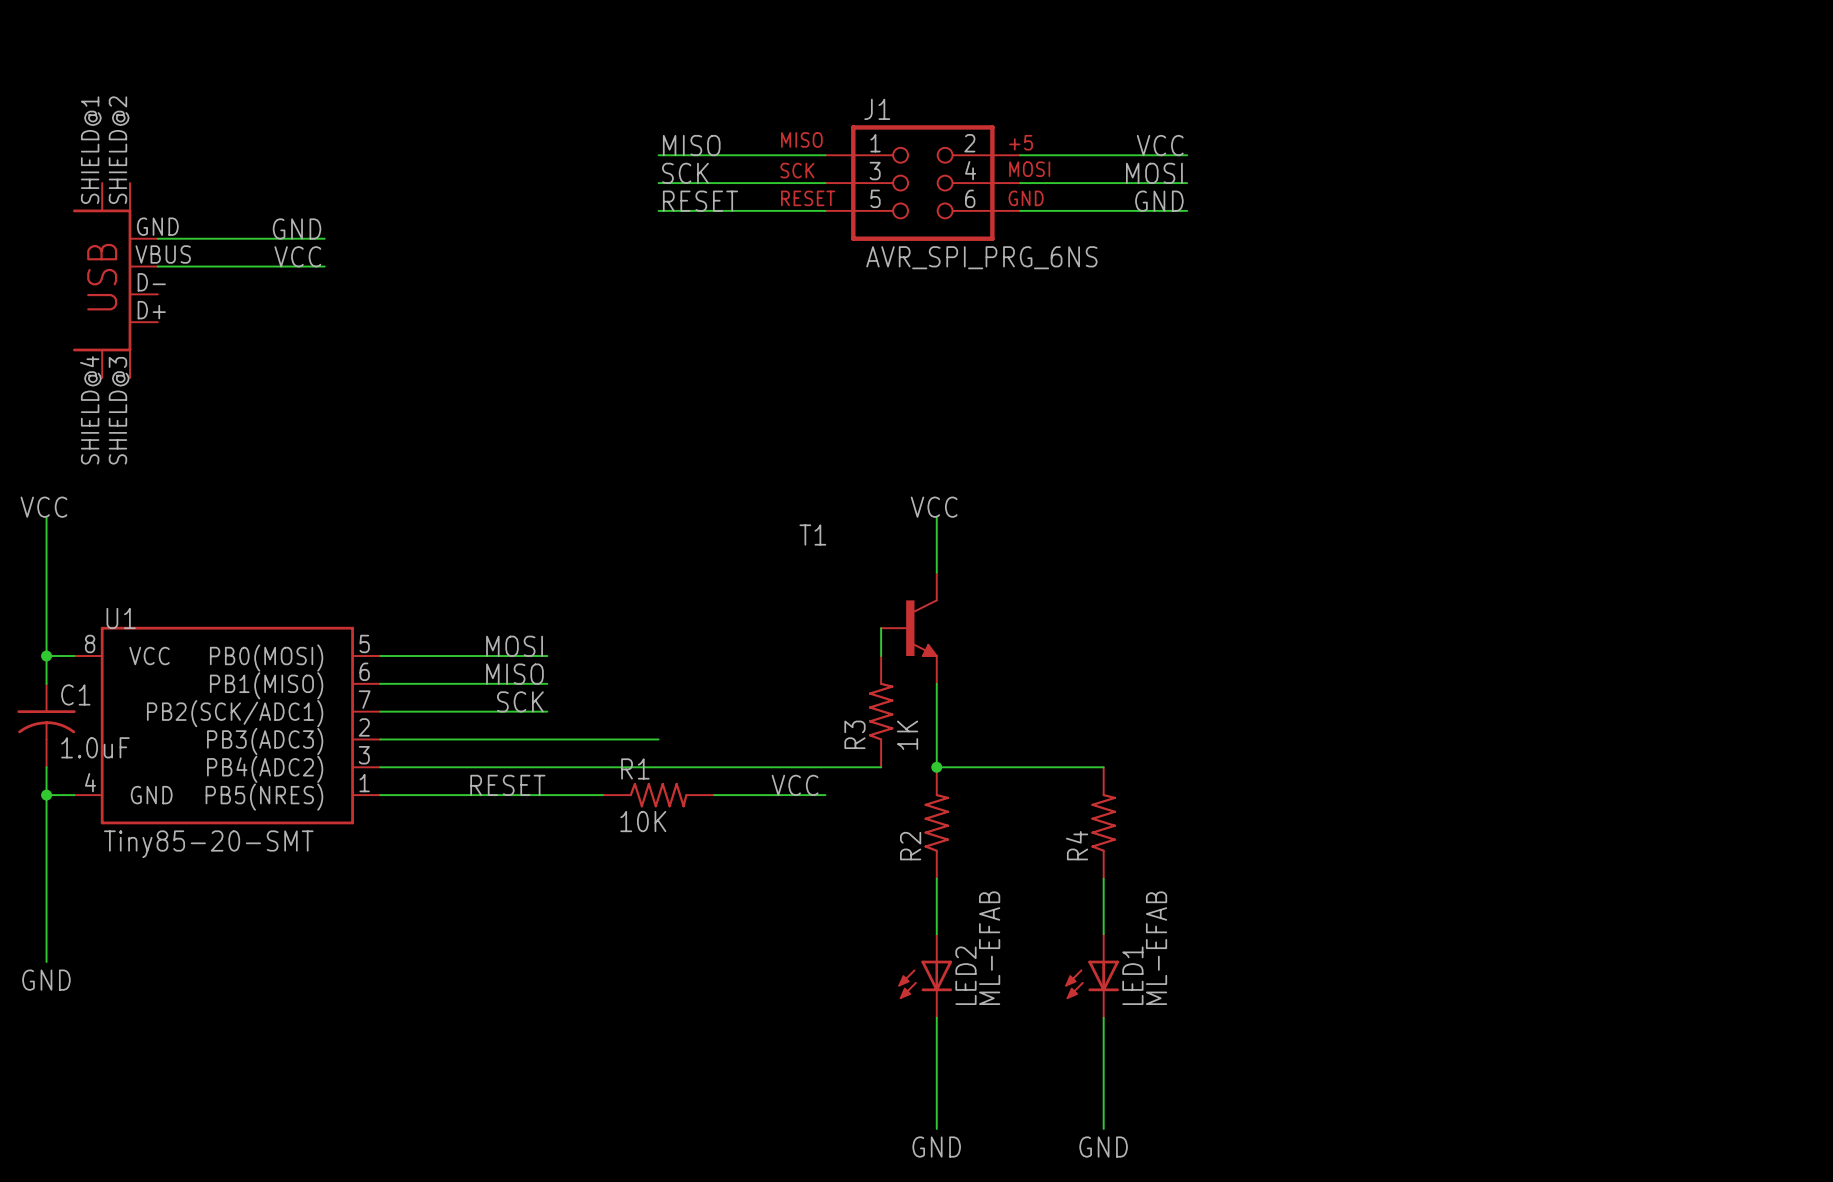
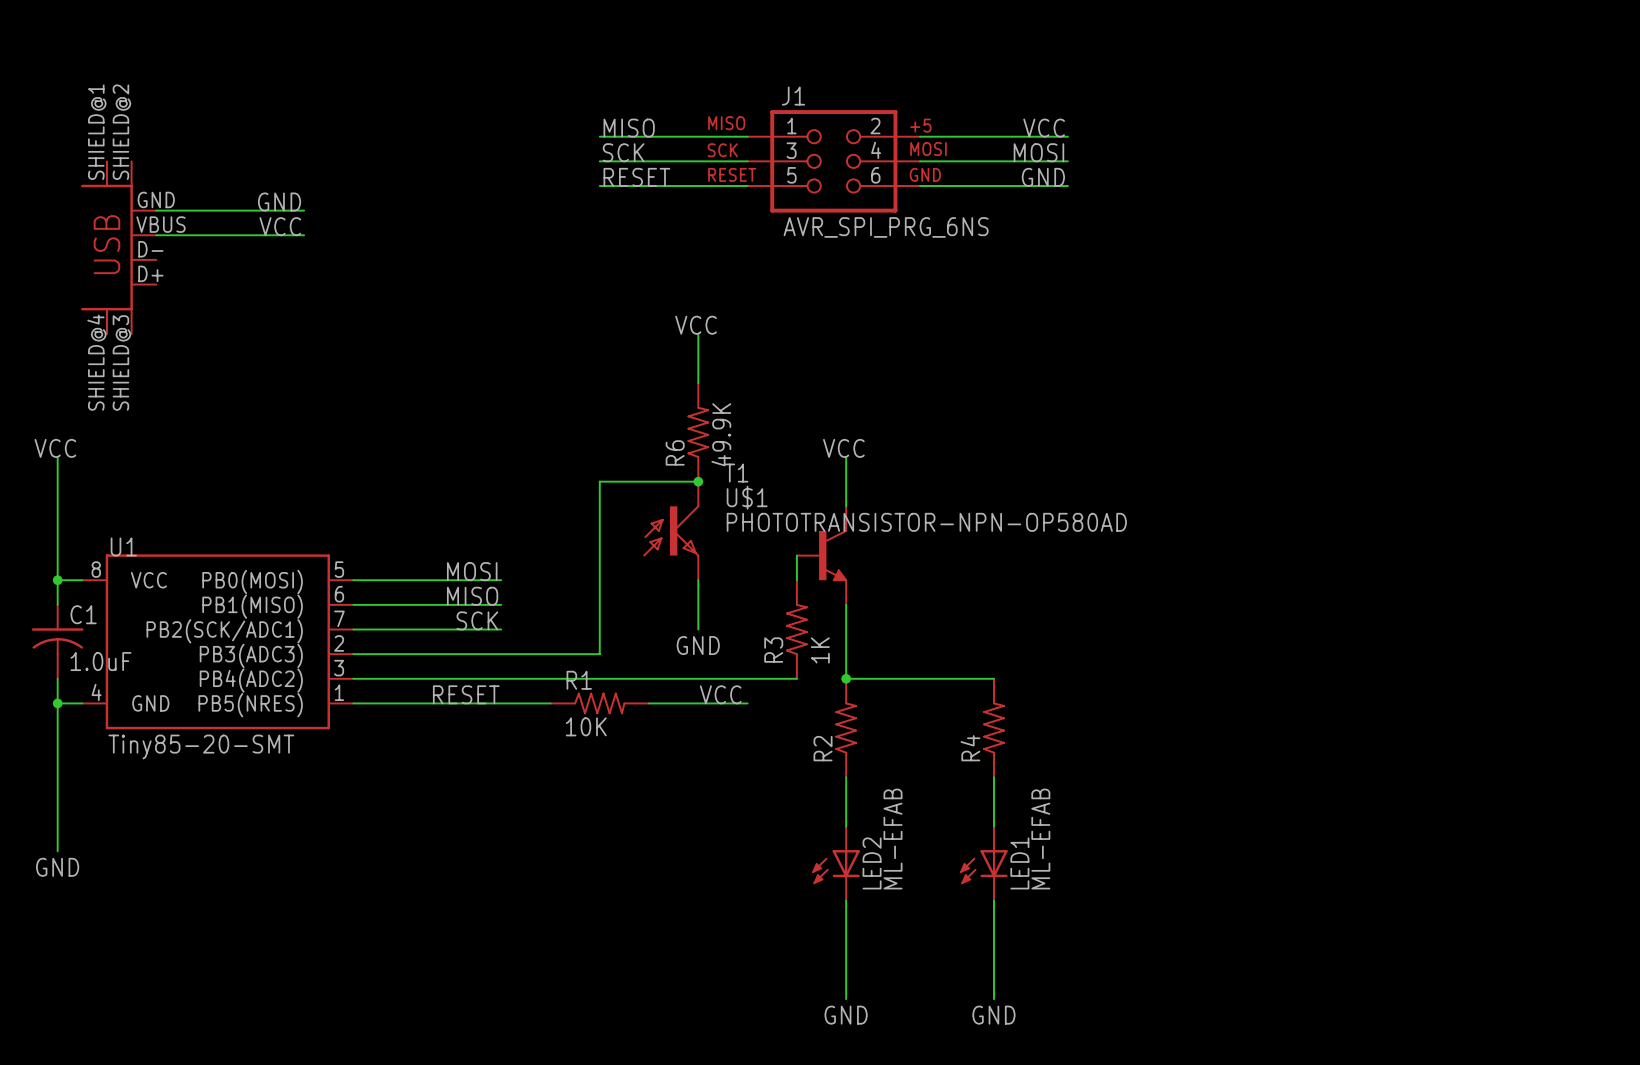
label: none -> VCC (696, 325)
wire: none -> (698, 333) (698, 383)
R6: none -> 49.9K (698, 432)
wire: none -> (698, 481) (599, 481) (599, 654)
junction: none -> (698, 481)
U$1: none -> PHOTOTRANSISTOR-NPN-OP580AD (671, 530)
wire: none -> (698, 580) (698, 629)
label: none -> GND (698, 645)

